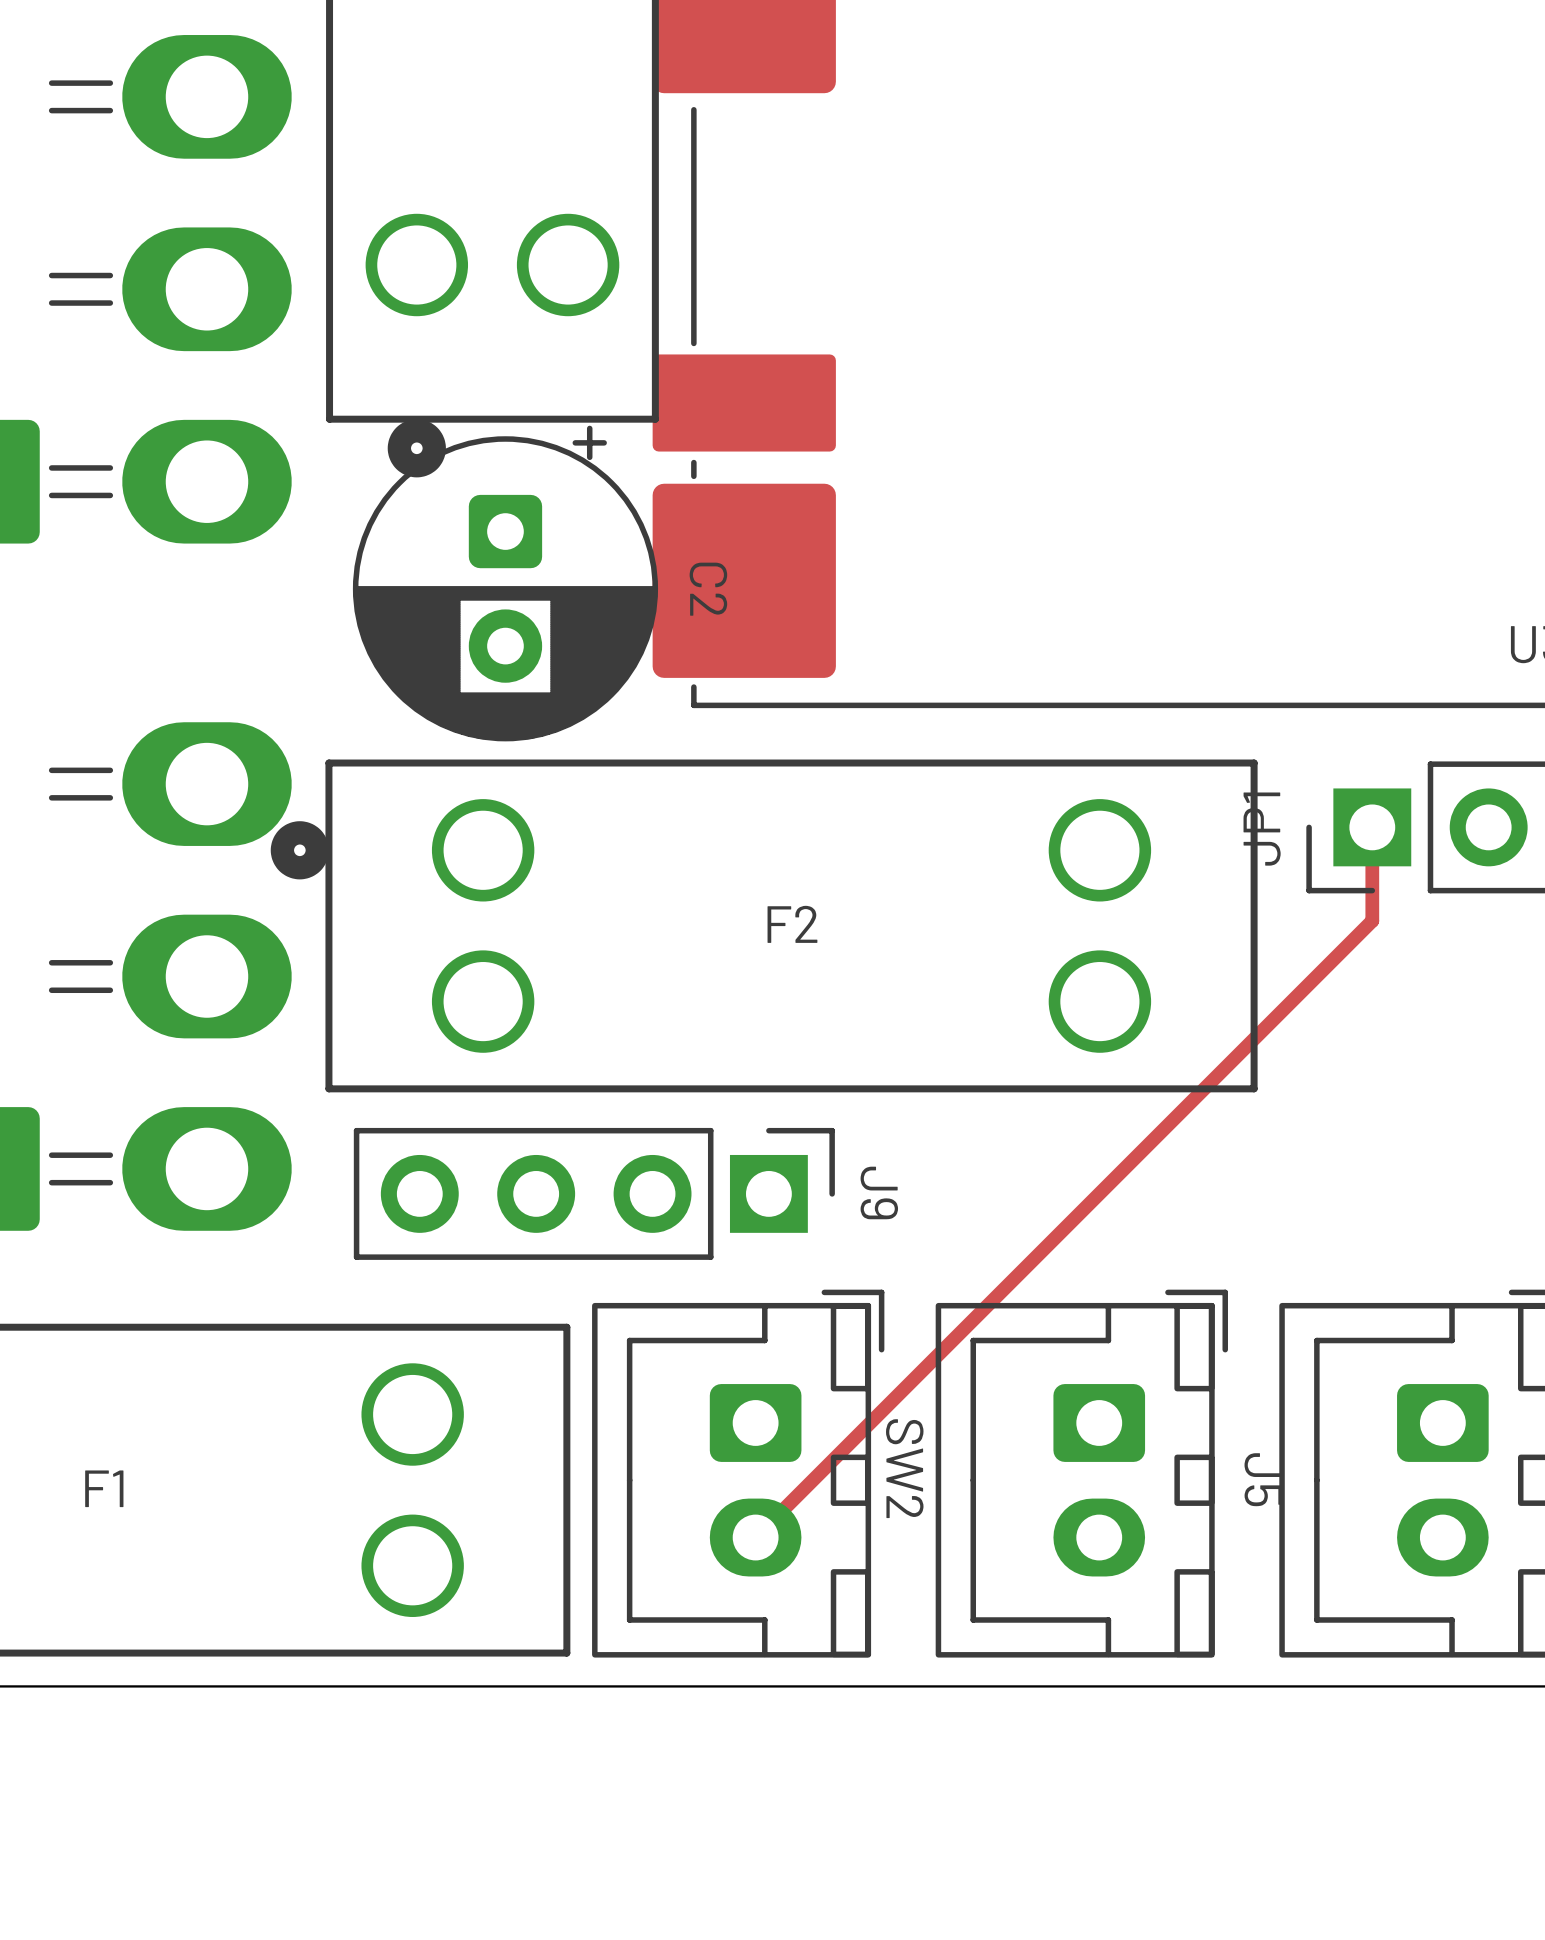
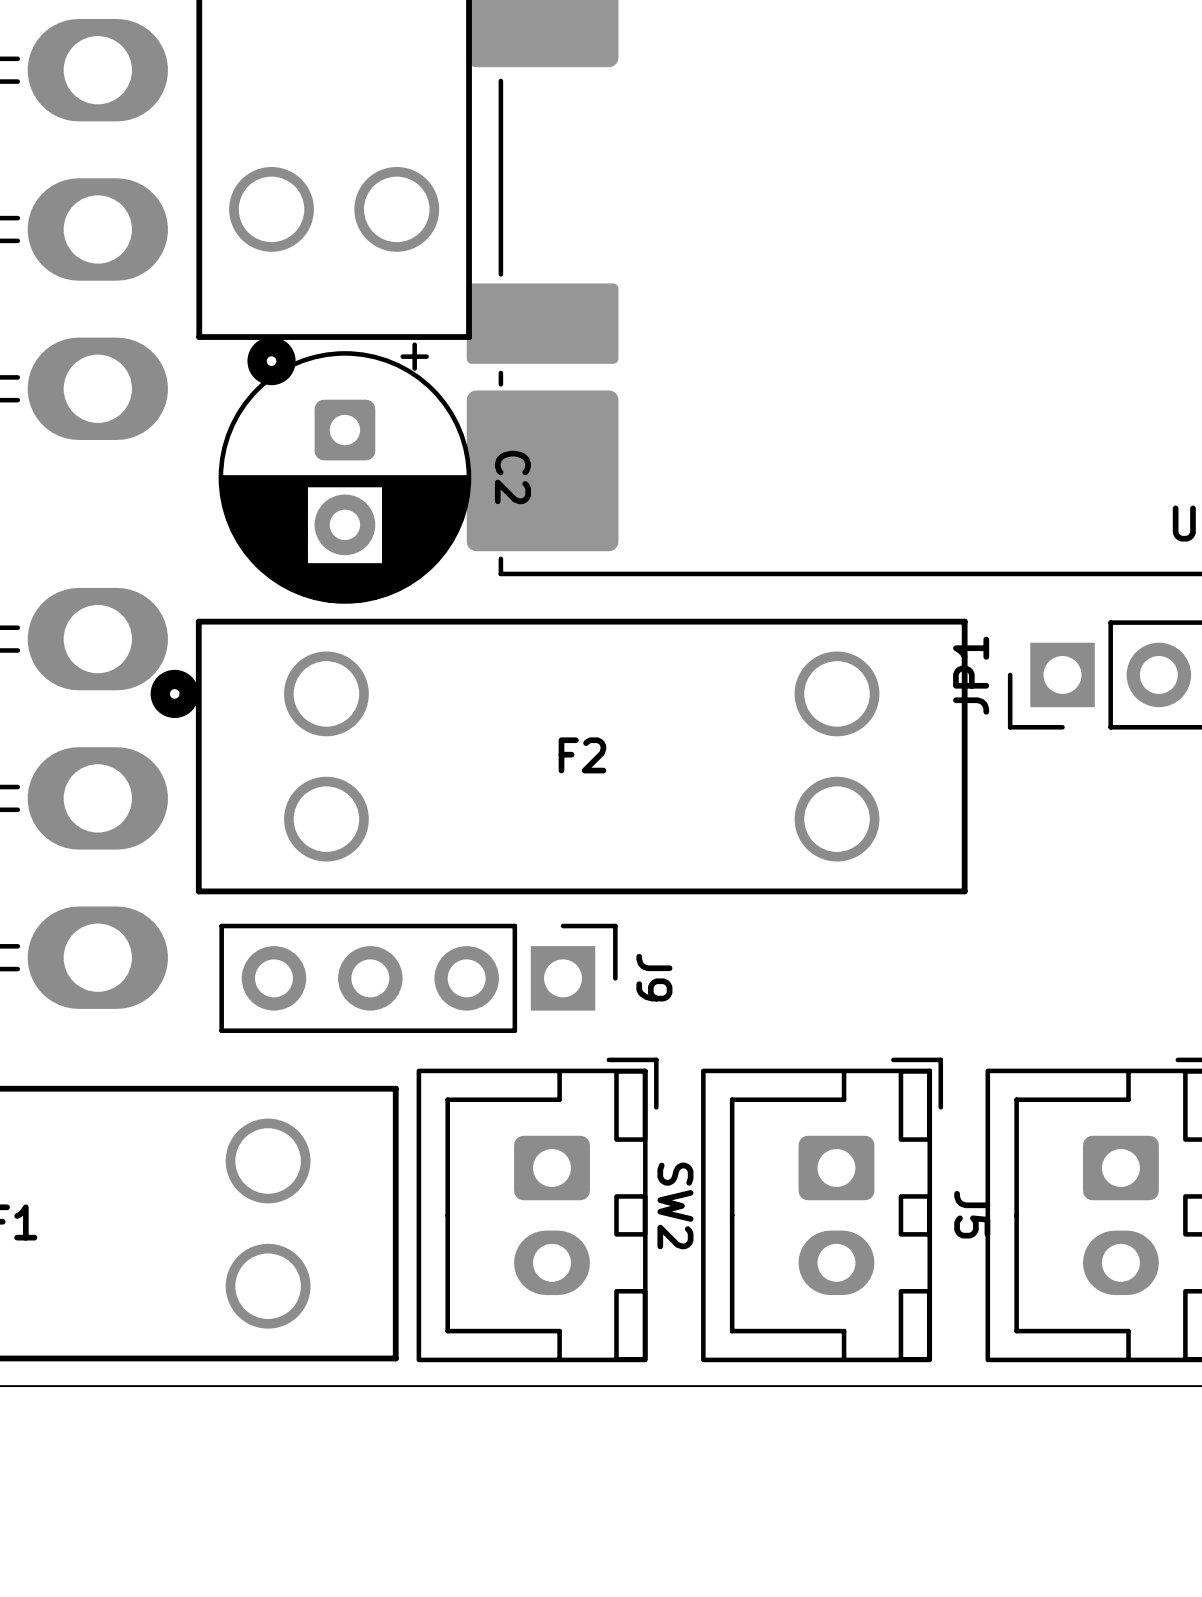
track: (1372, 827) (1372, 920) (755, 1537) -> none

